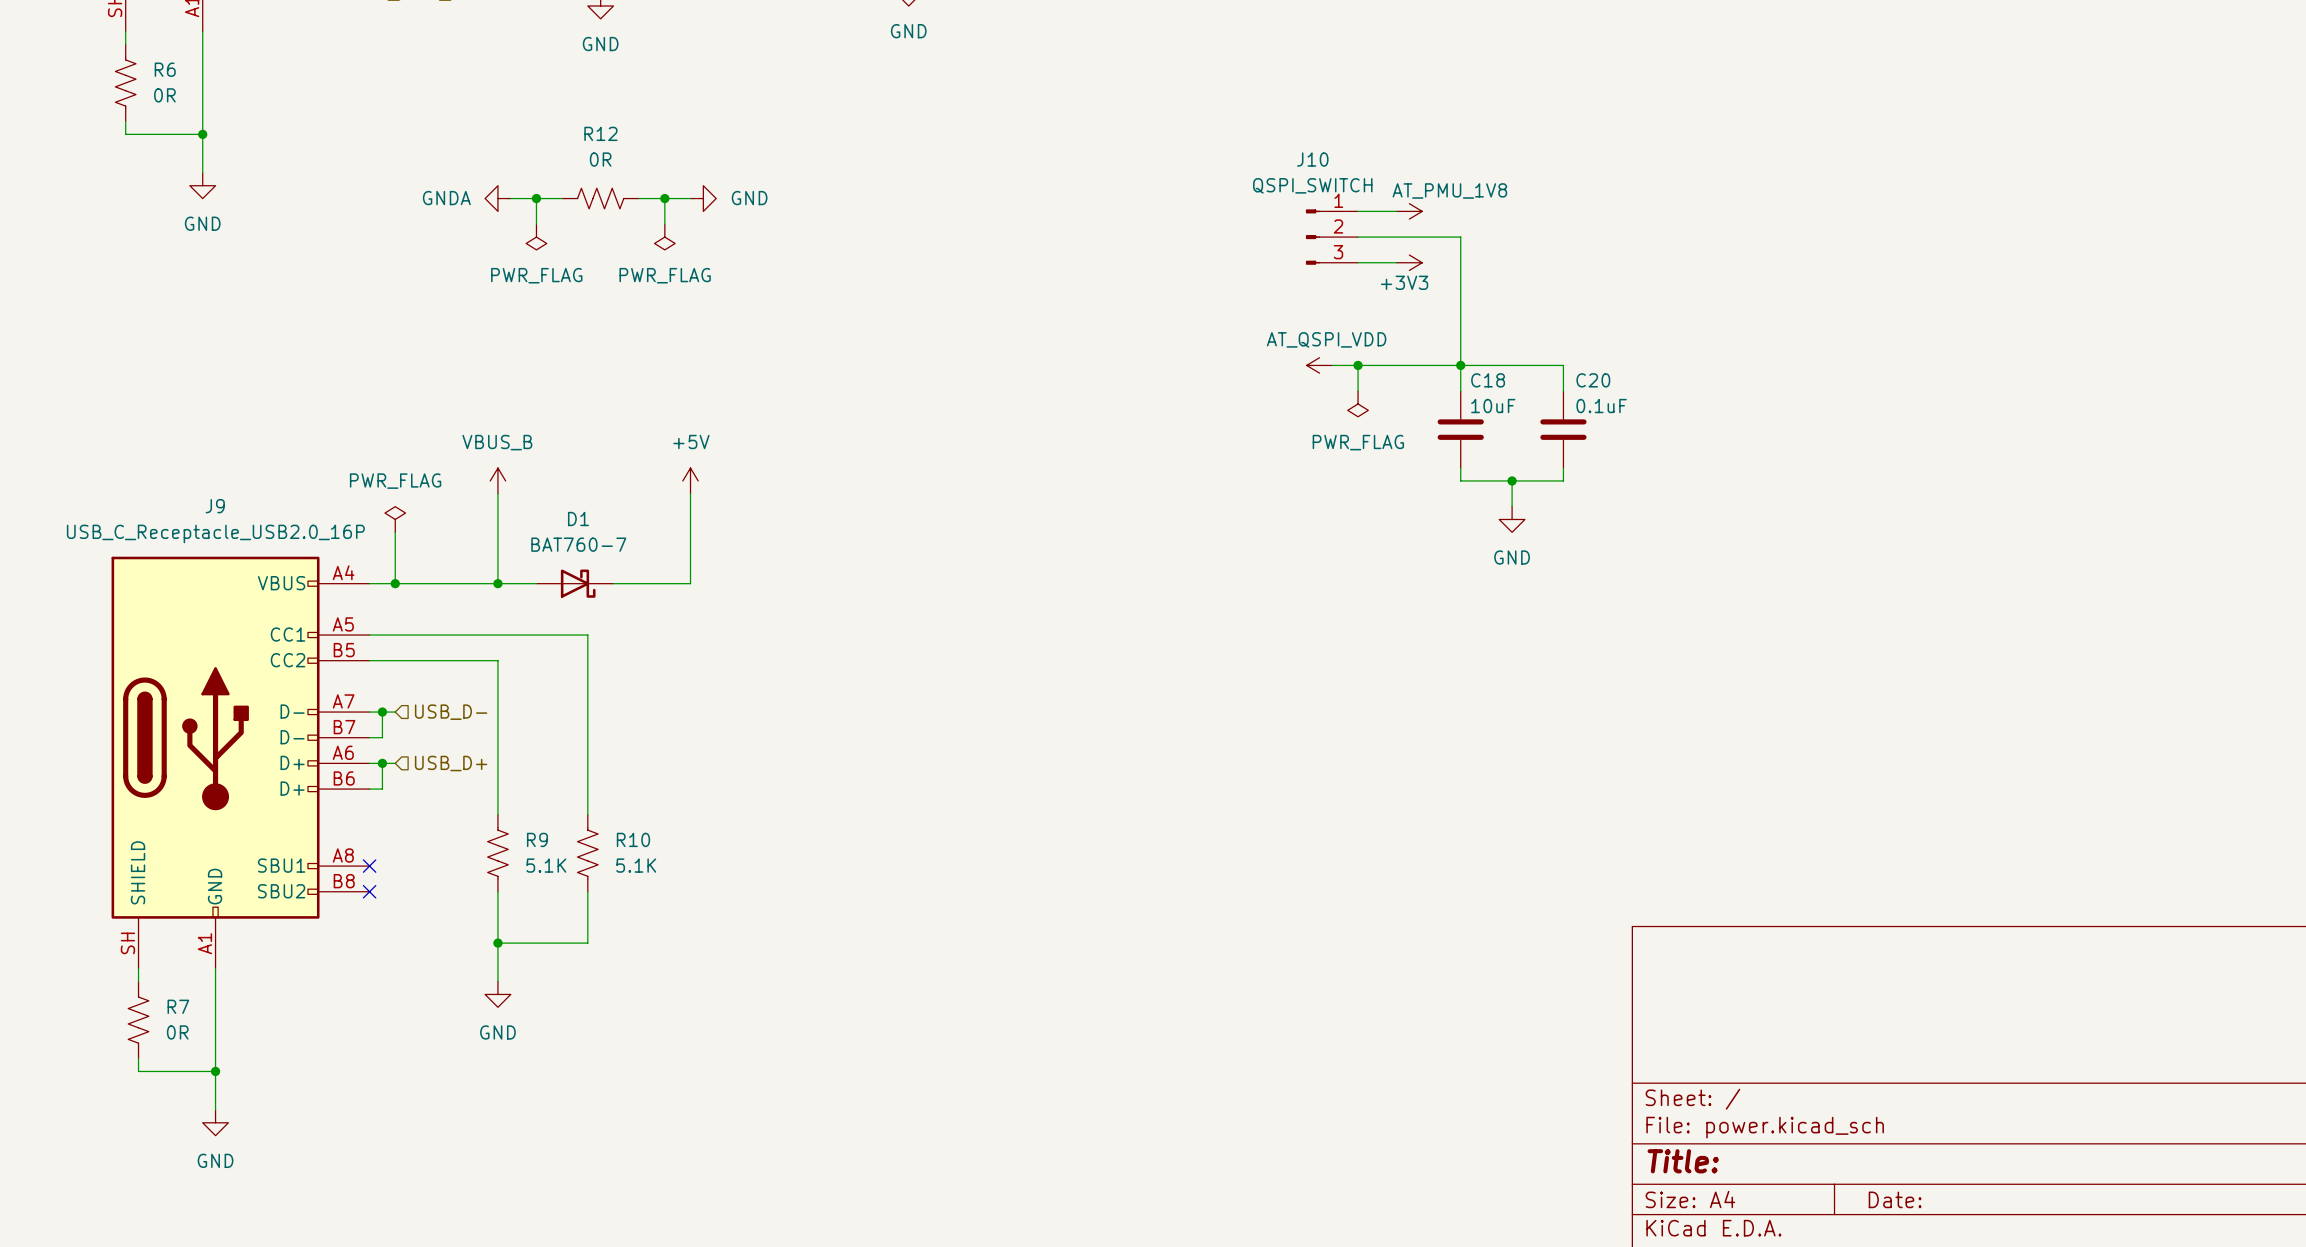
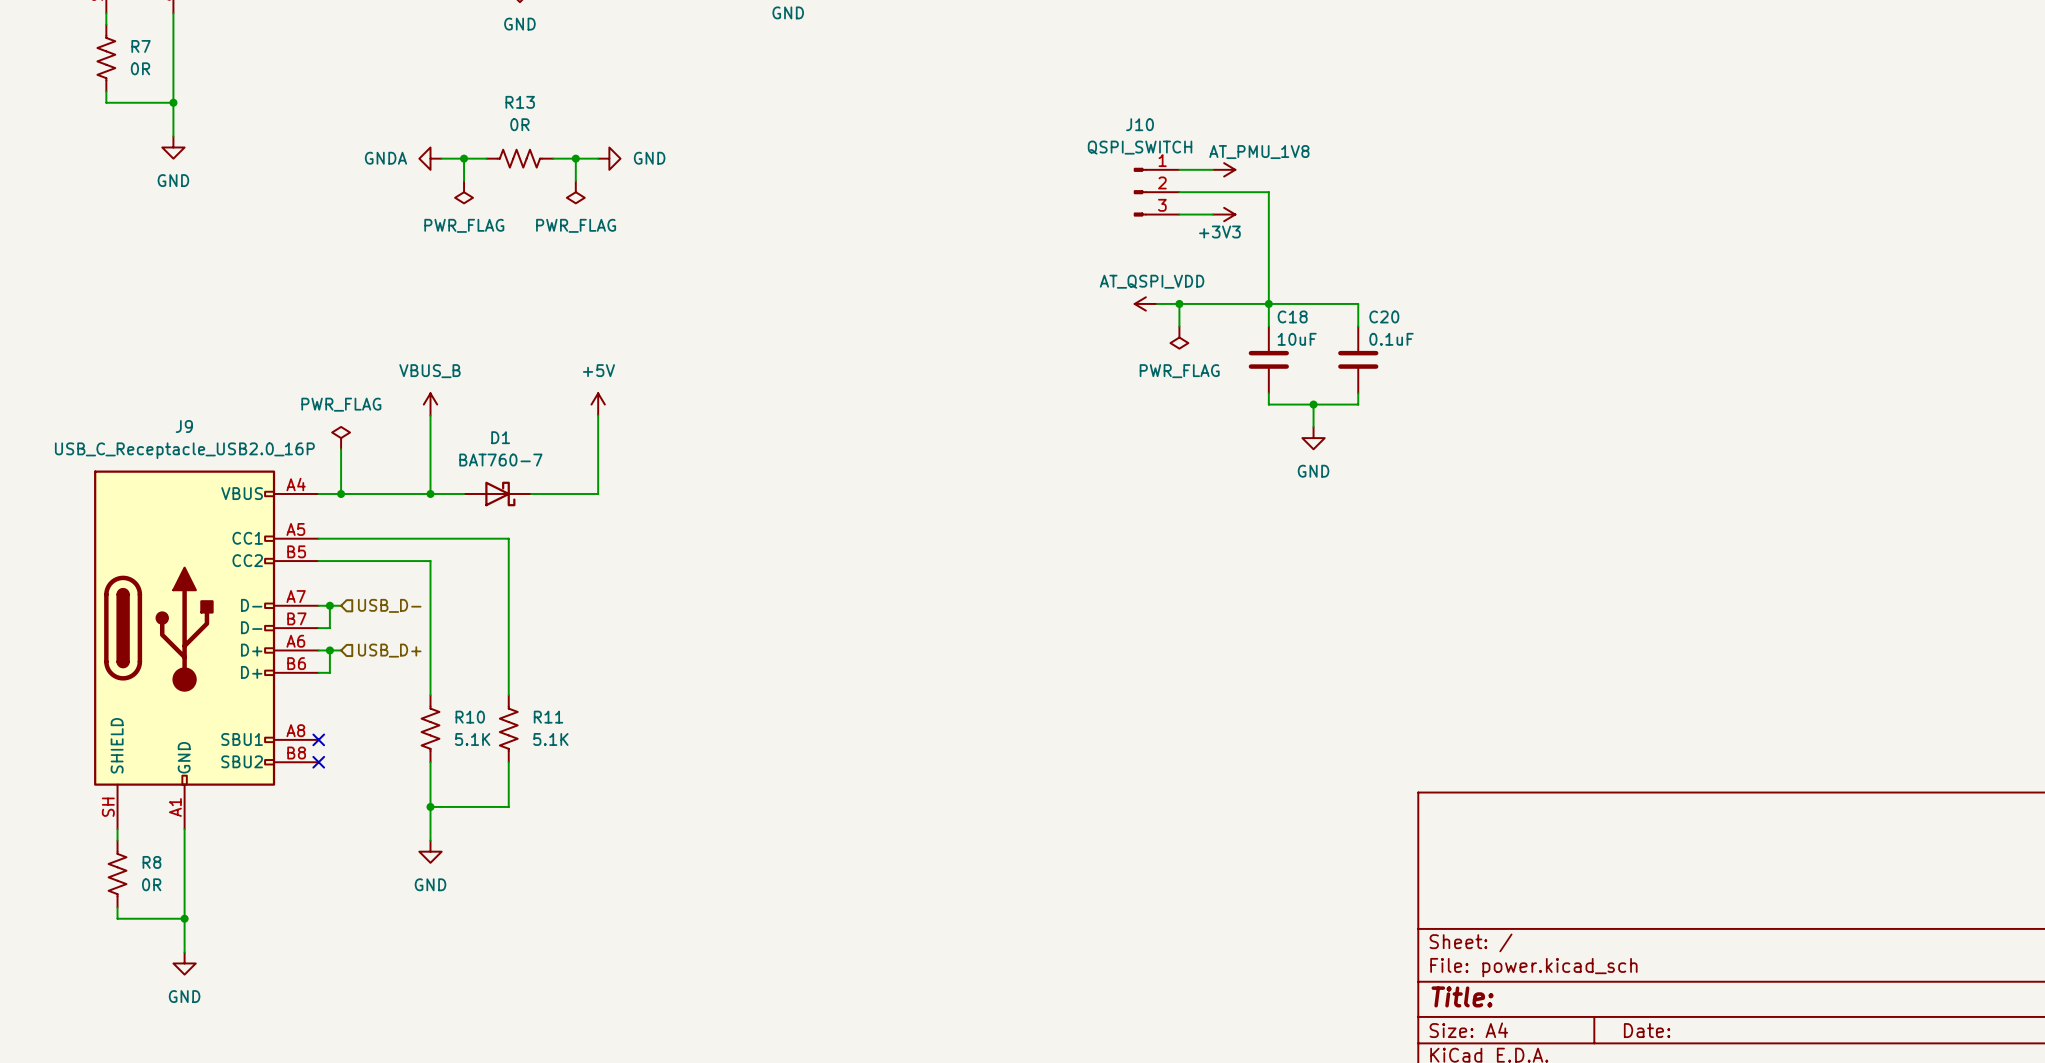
R6 name: R6 (165, 69) -> R7 (141, 46)
R12 name: R12 (600, 133) -> R13 (520, 102)
R9 name: R9 (537, 839) -> R10 (470, 717)
R10 name: R10 (633, 839) -> R11 (548, 717)
R7 name: R7 (178, 1006) -> R8 (151, 862)

